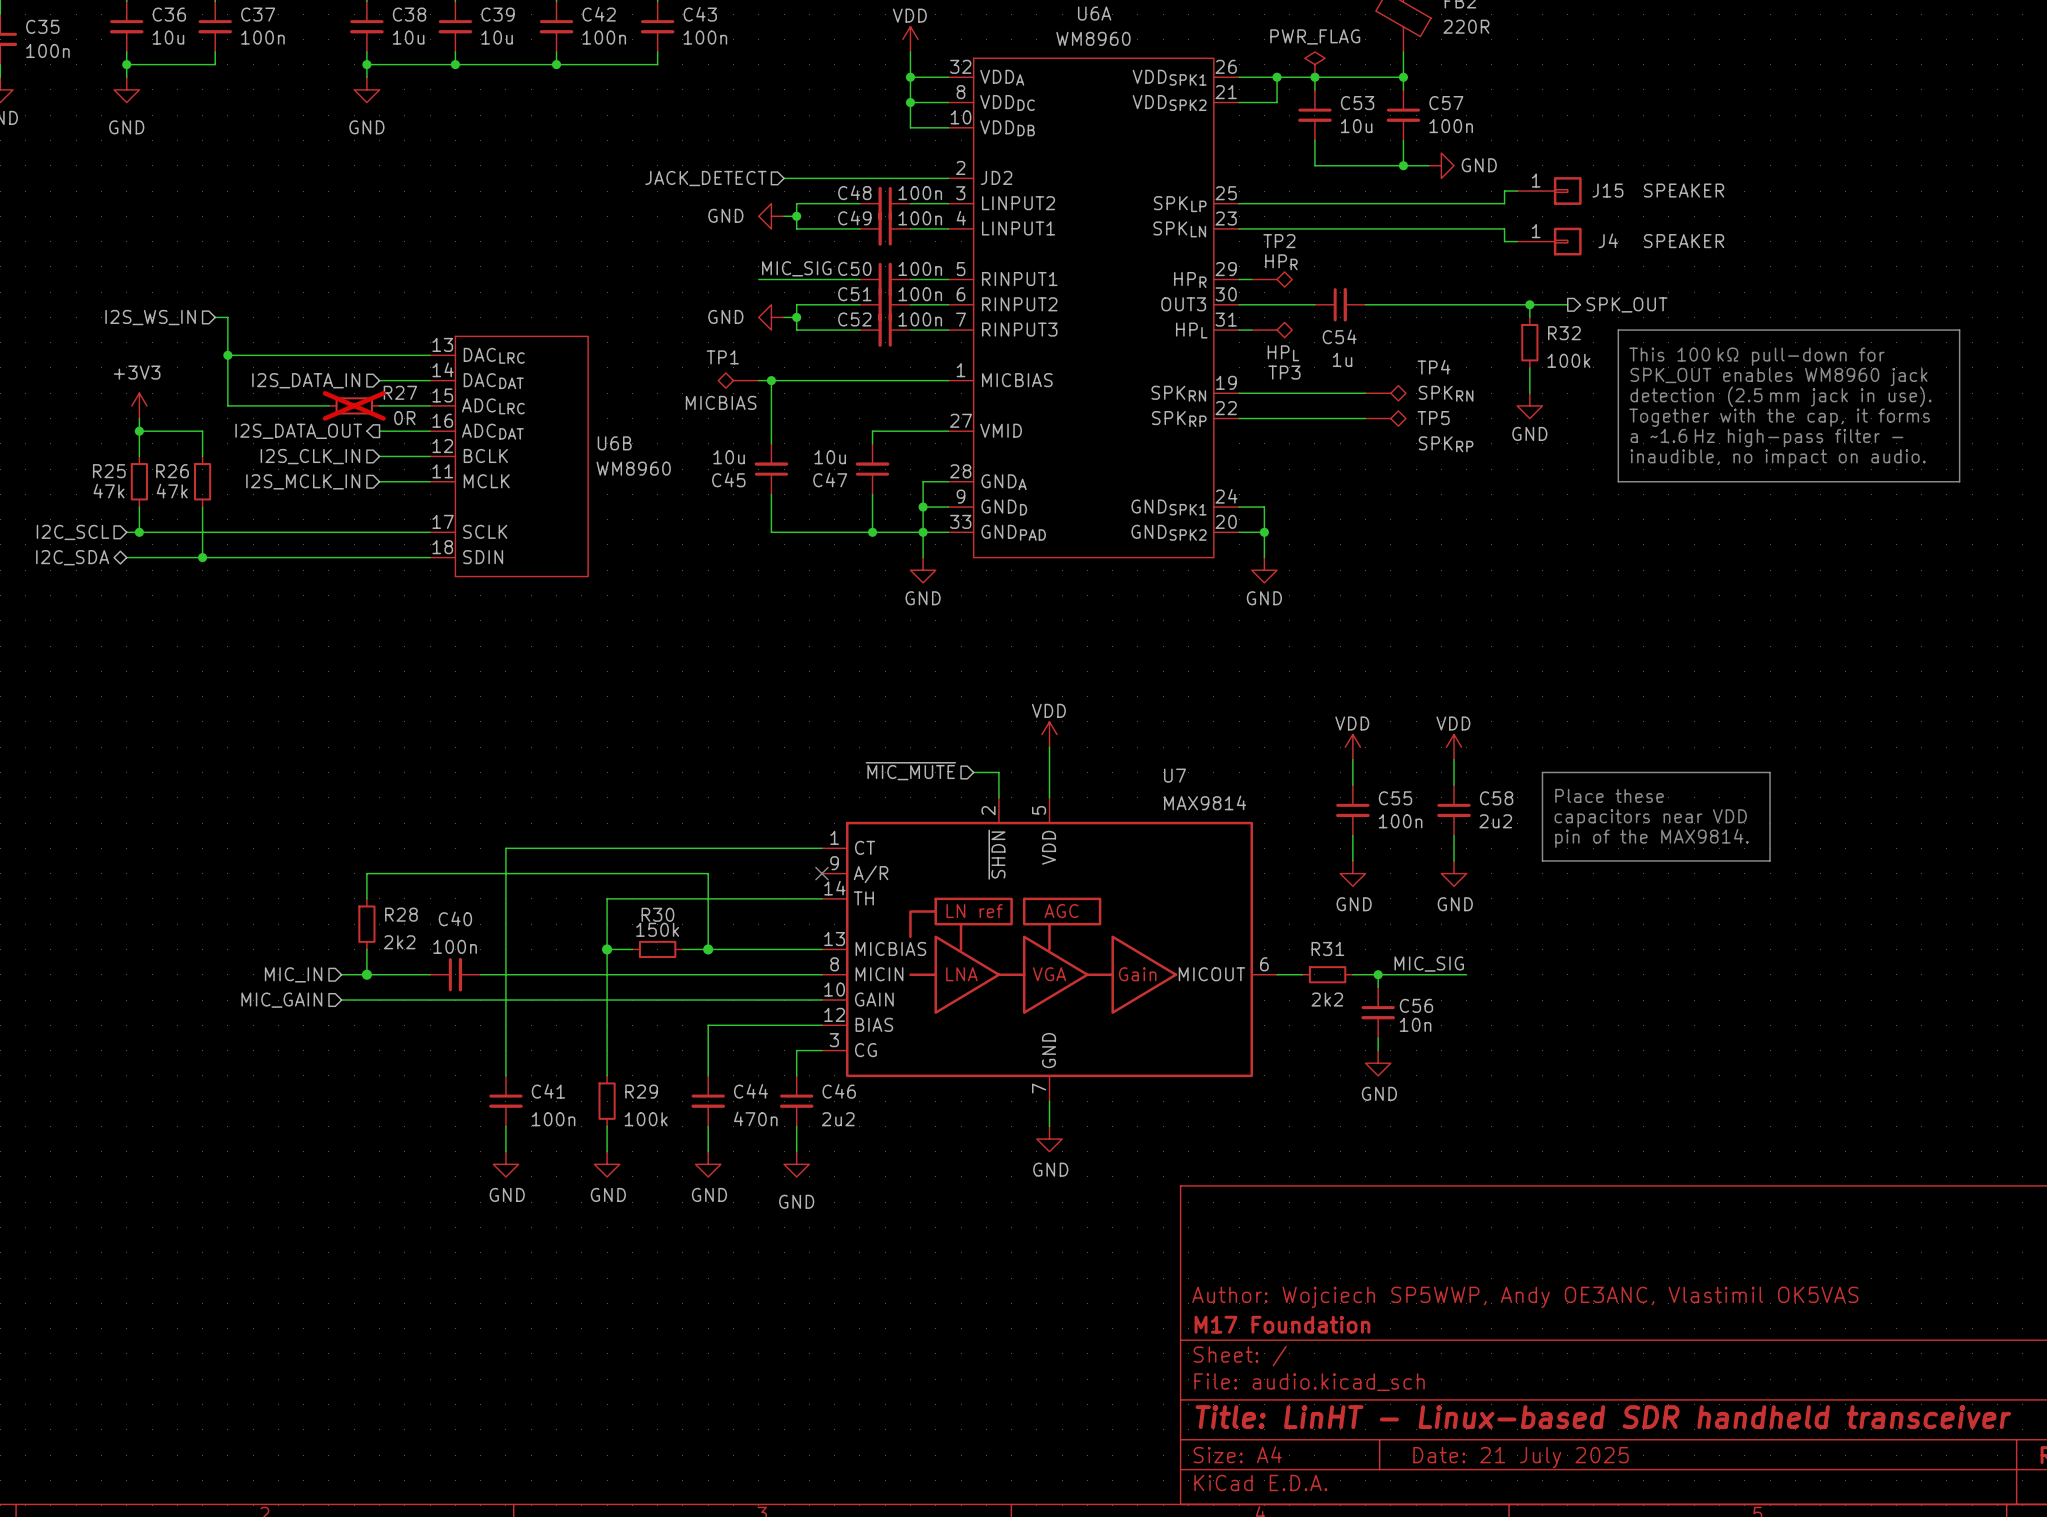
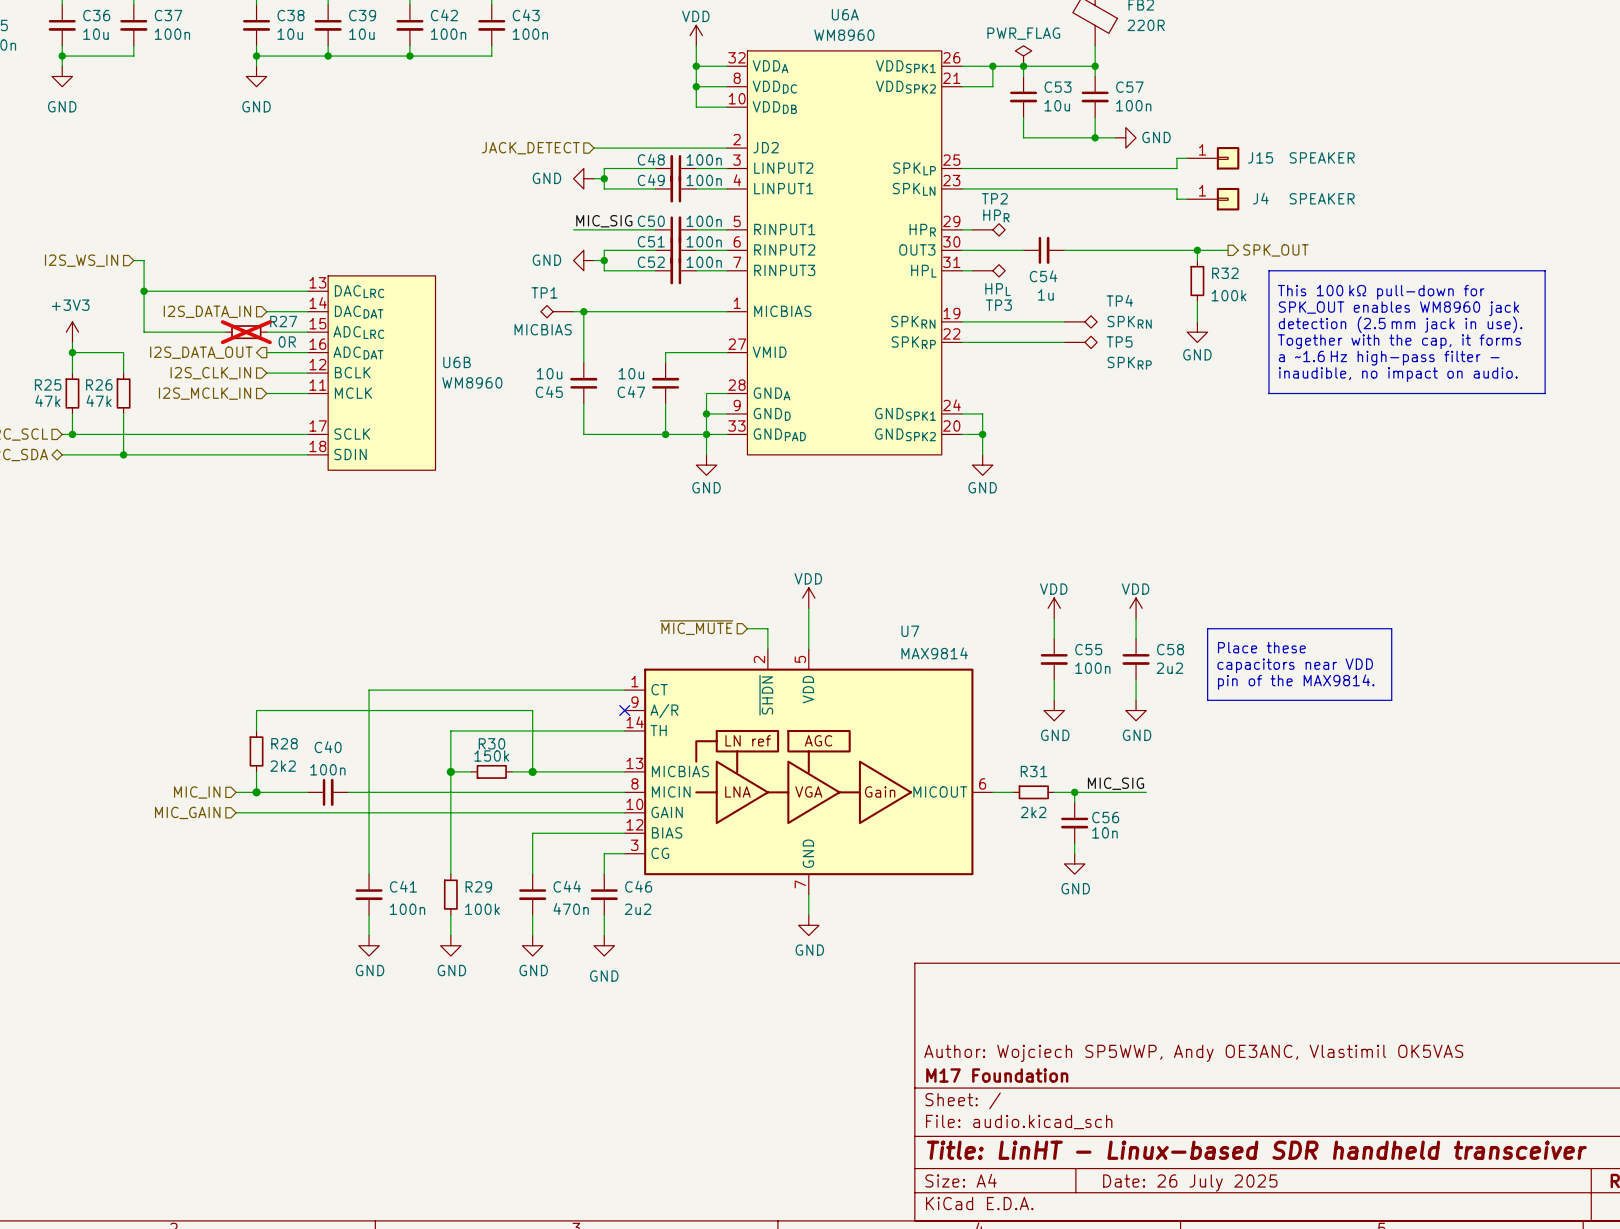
title block: Date: 21 July 2025 (1521, 1457) -> Date: 26 July 2025 (1190, 1183)

